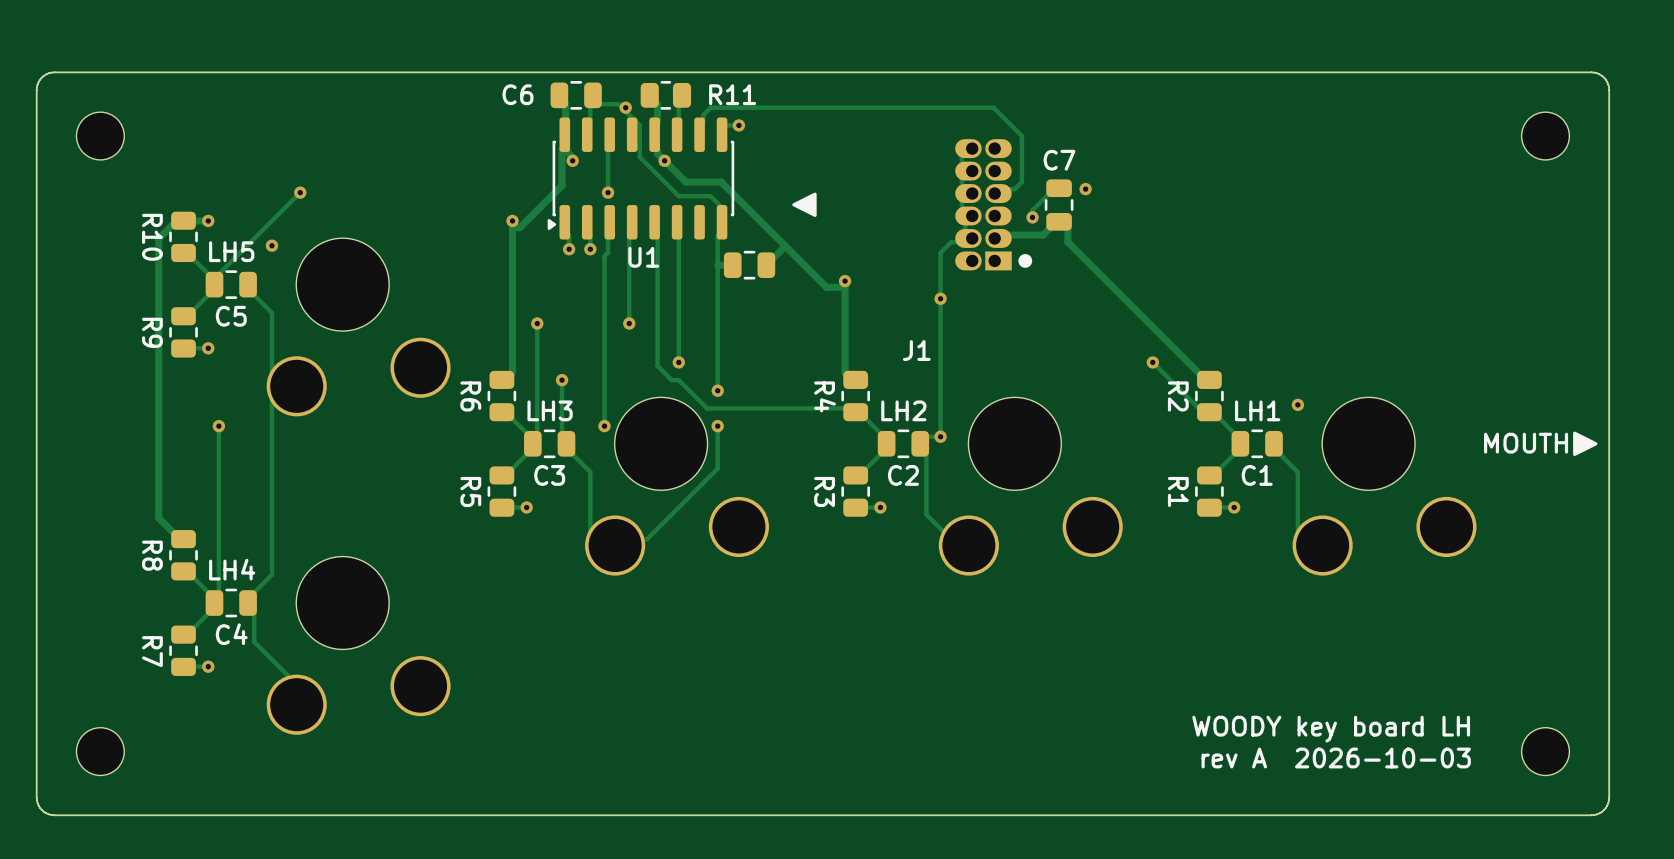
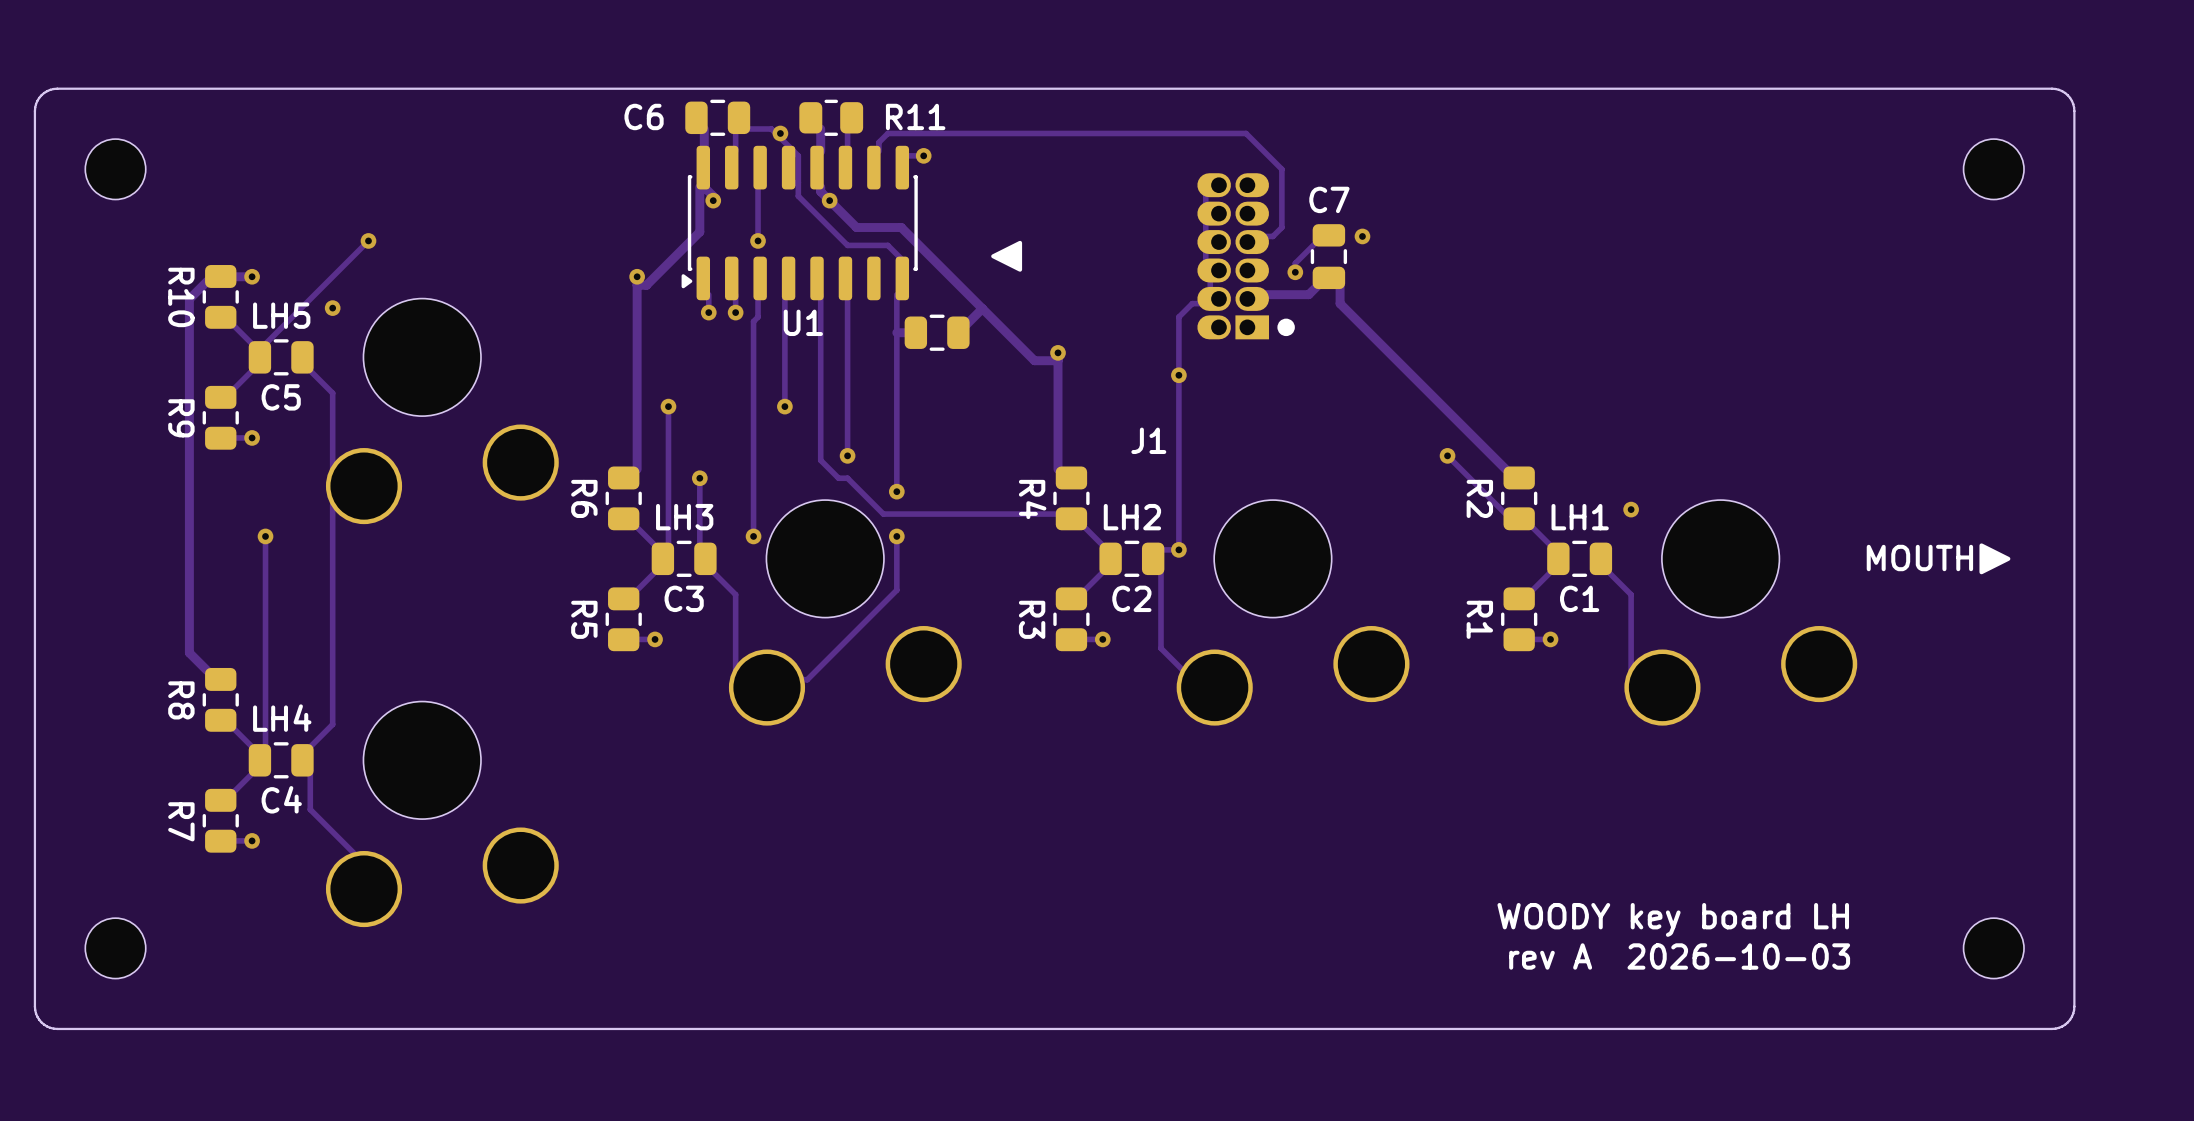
board edge: (1591, 72) (1604, 77) (1609, 90) (1609, 797) (1604, 810) (1591, 815) -> (2002, 88) (2058, 89) (2070, 97) (2074, 111) (2074, 1006) (2070, 1019) (2058, 1027) (2002, 1028)
part position: (1545, 136) -> (1993, 169)
part position: (1545, 751) -> (1993, 948)

